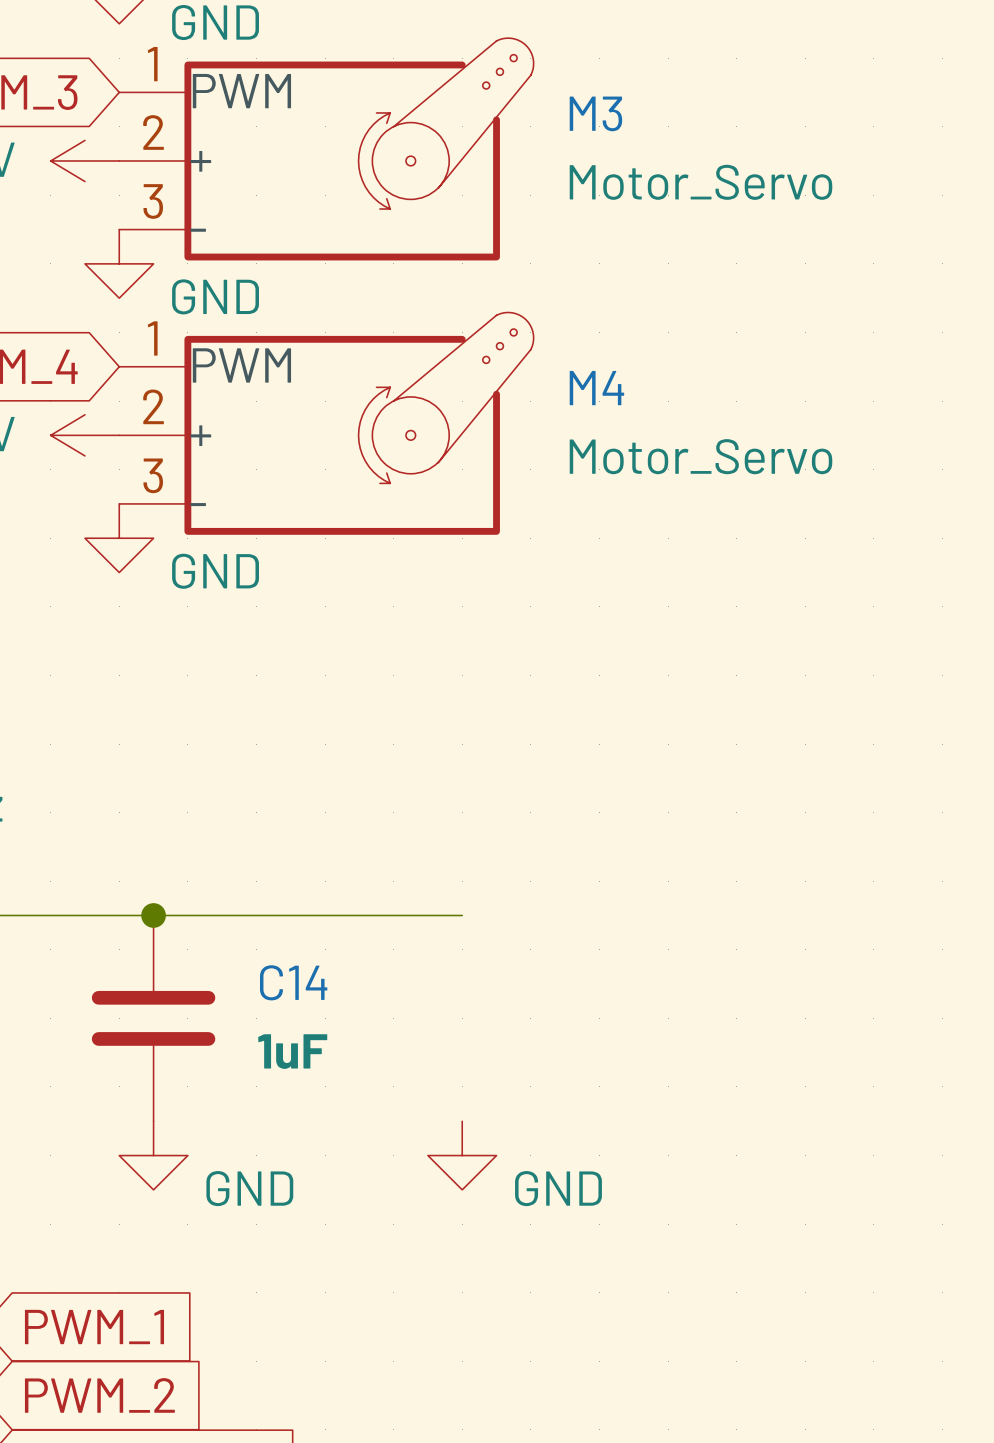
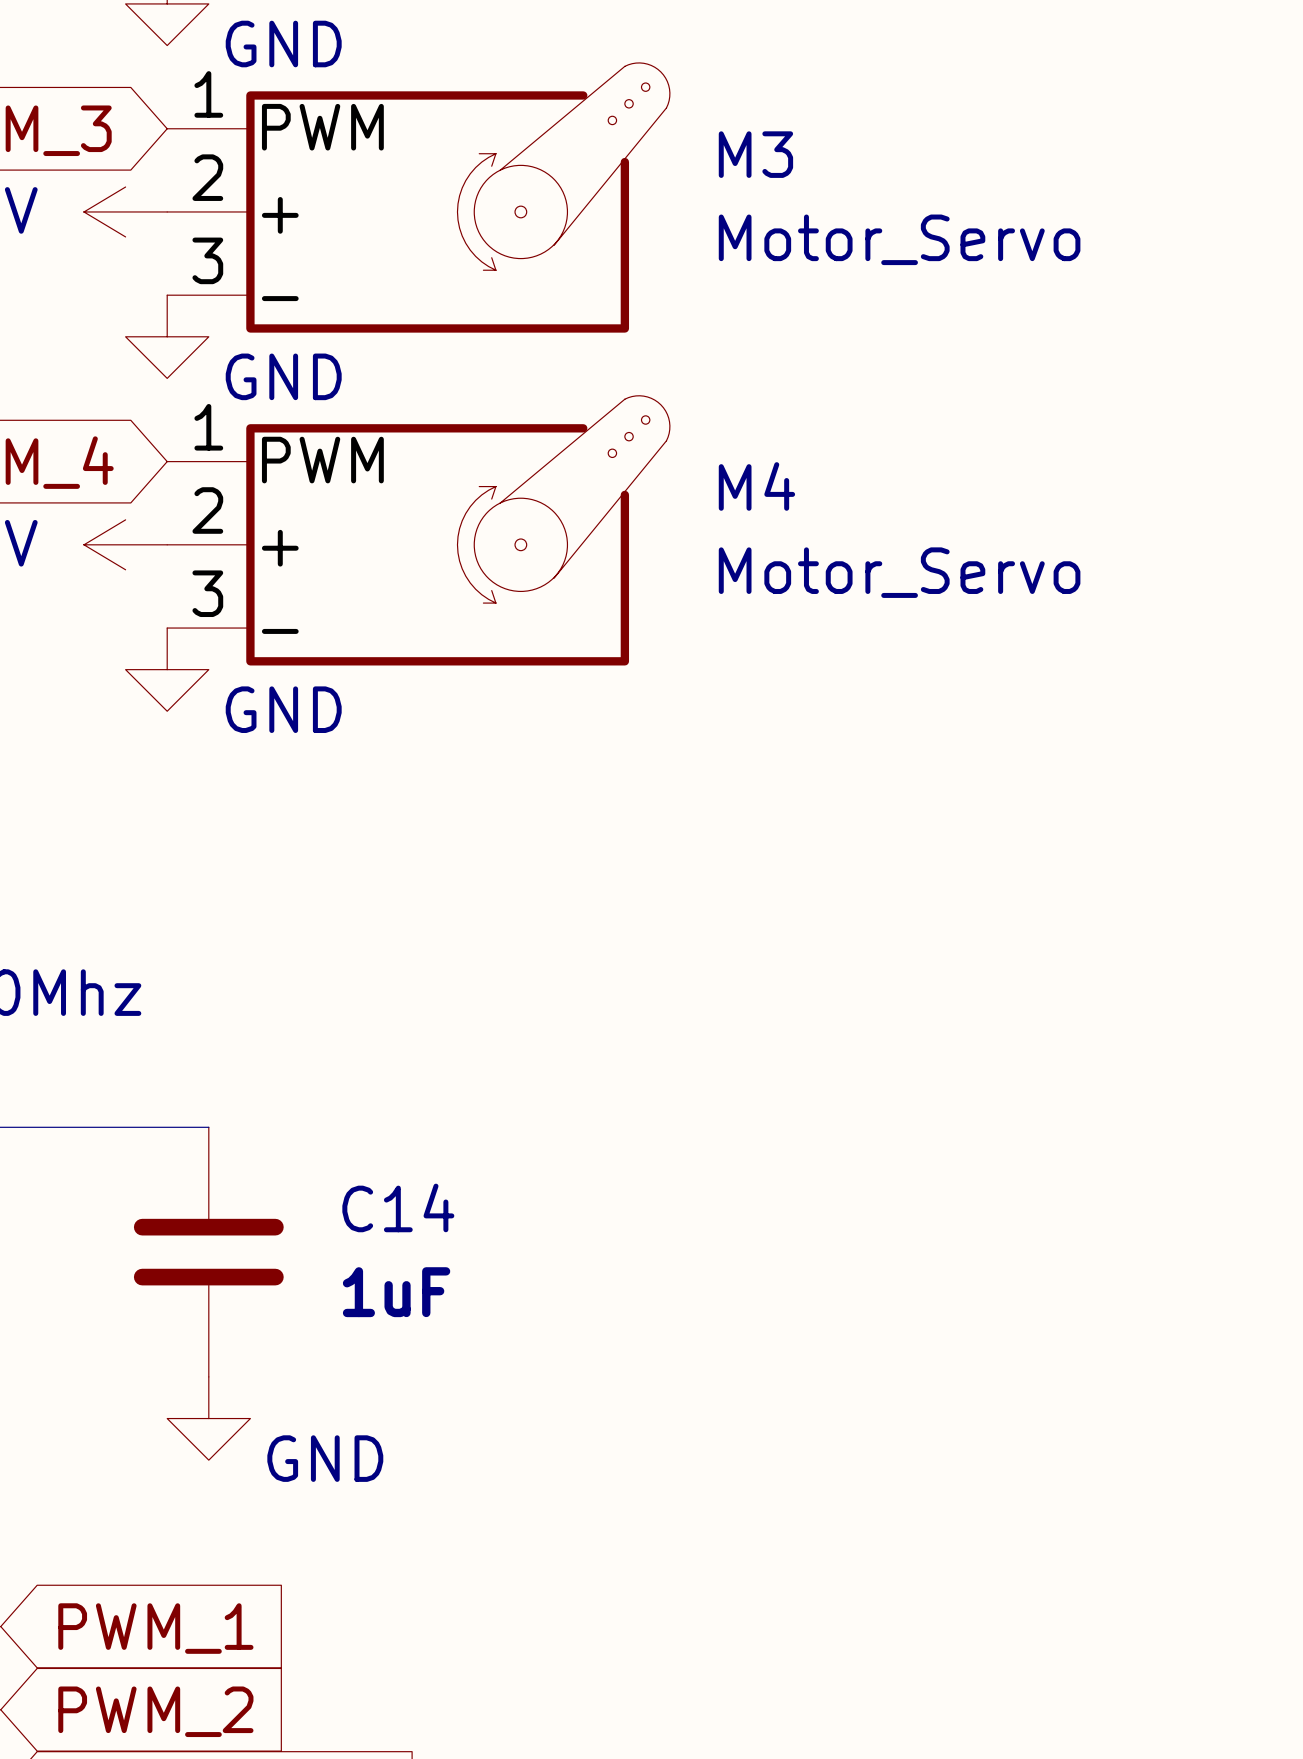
wire: (153, 915) (462, 915) -> none
junction: (153, 915) -> none
power symbol: GND (462, 1155) -> none

